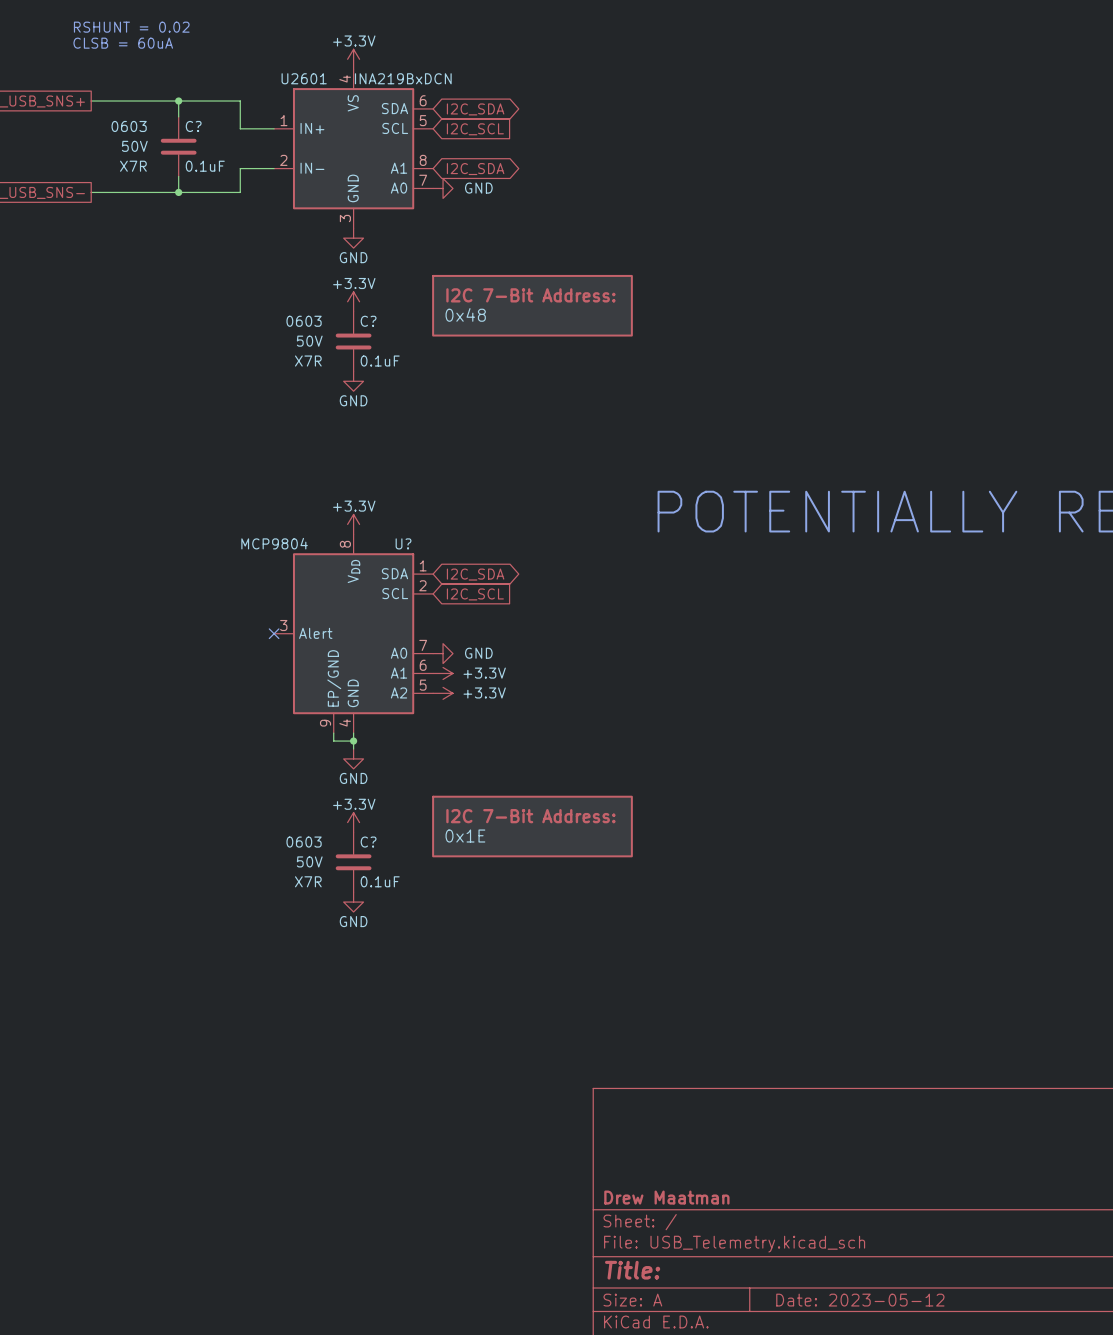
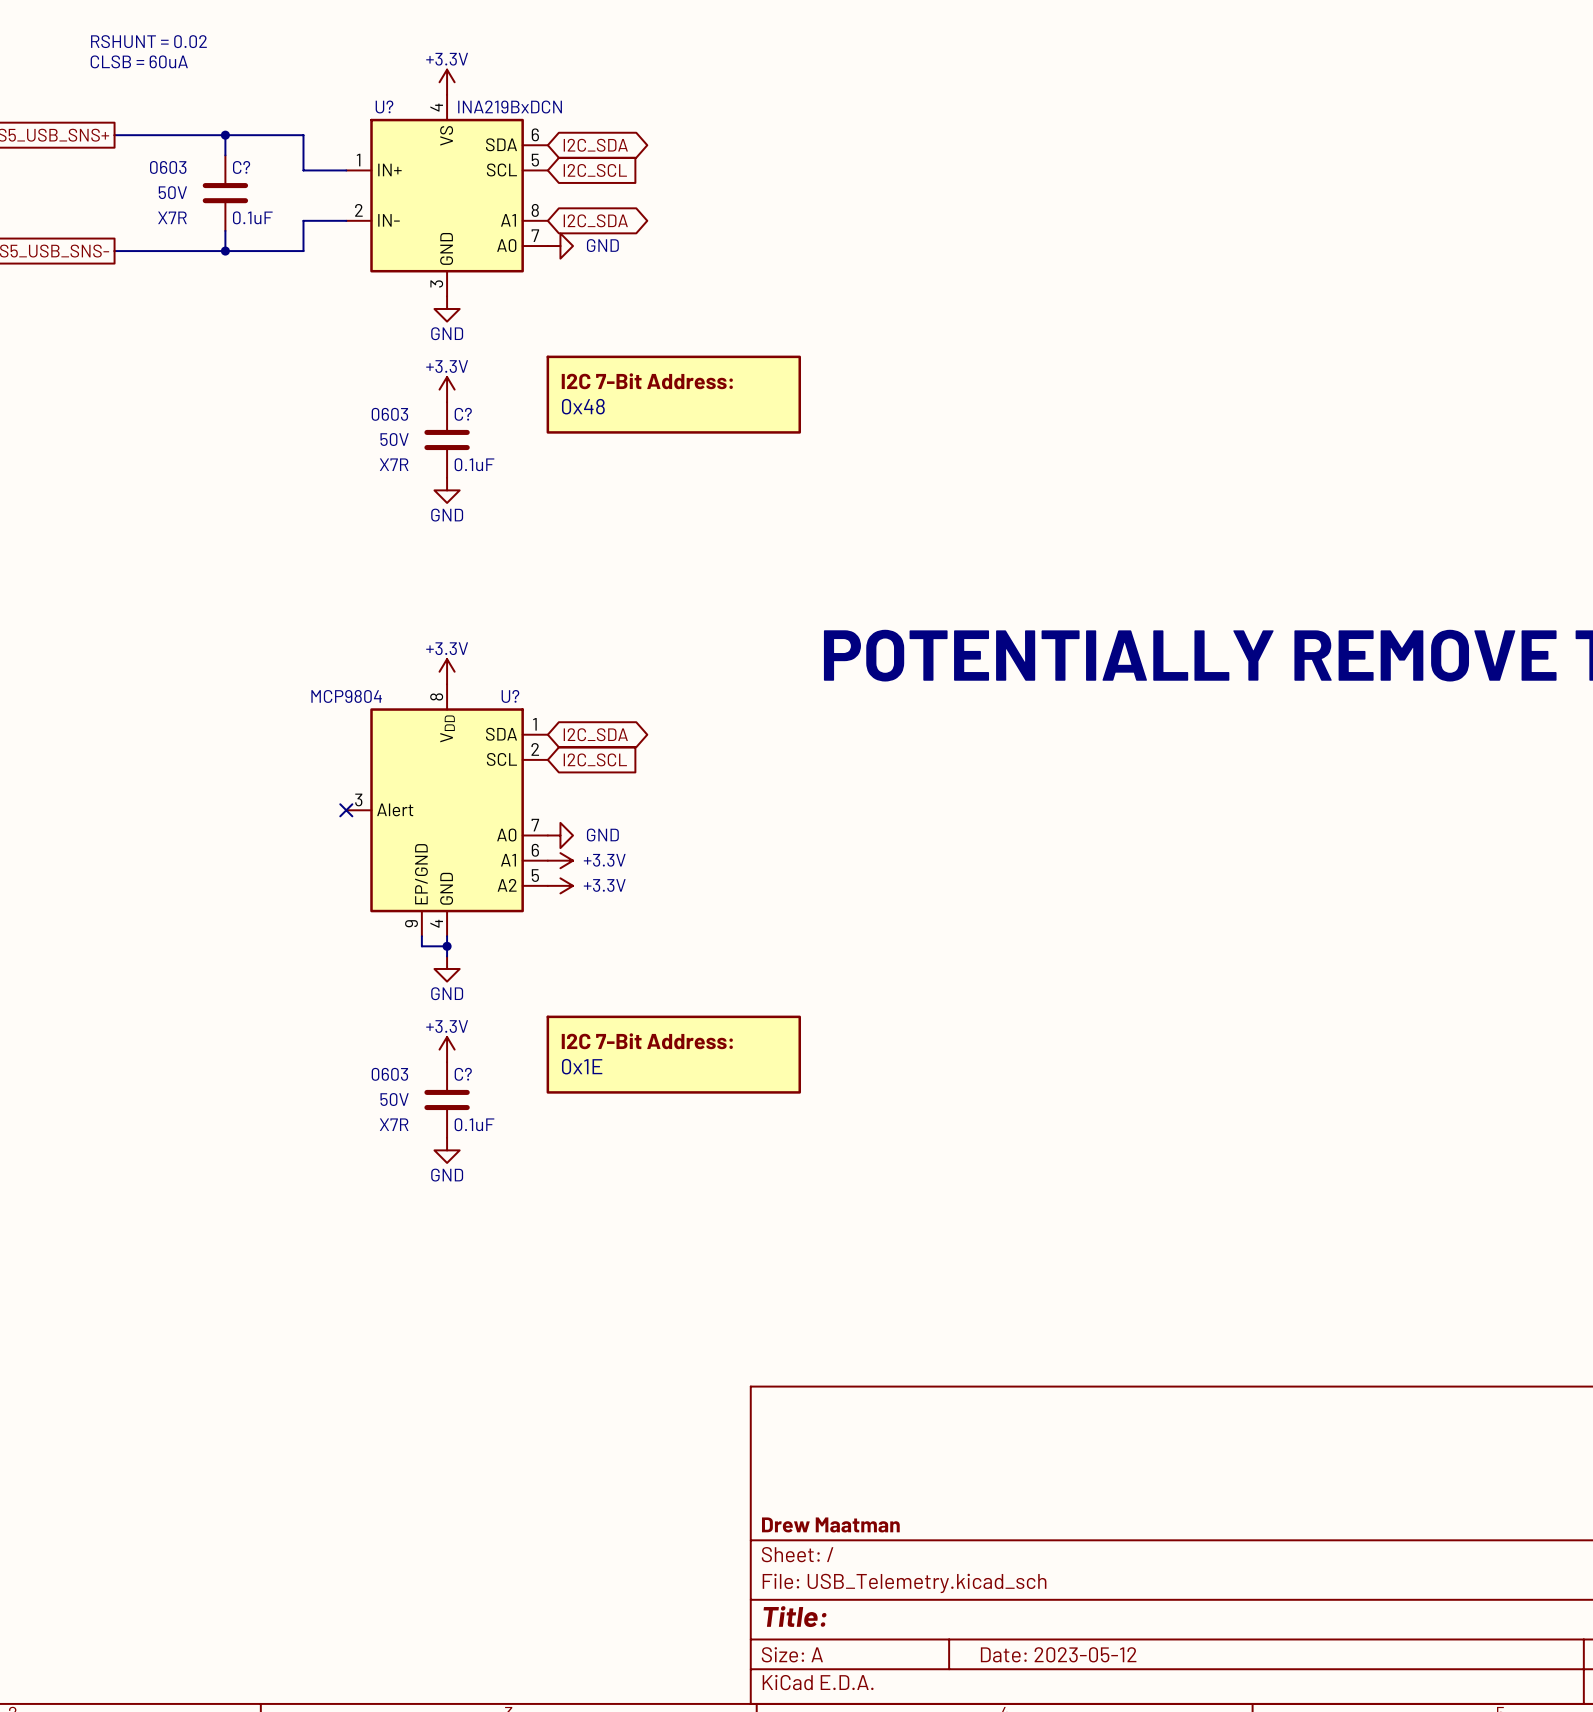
U2601 name: U2601 (304, 78) -> U? (384, 106)

